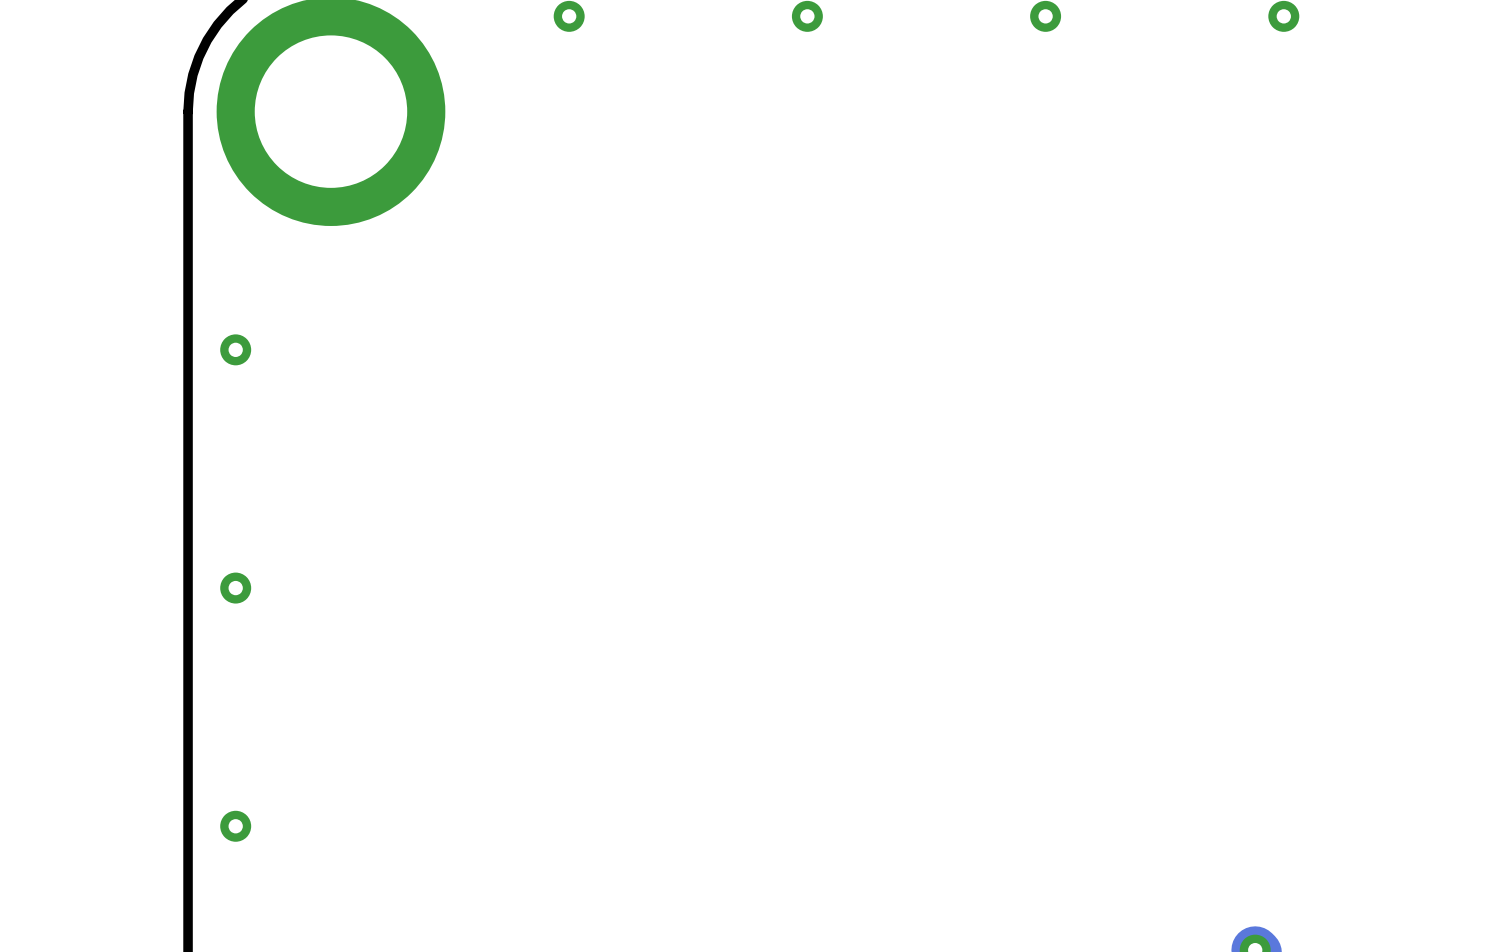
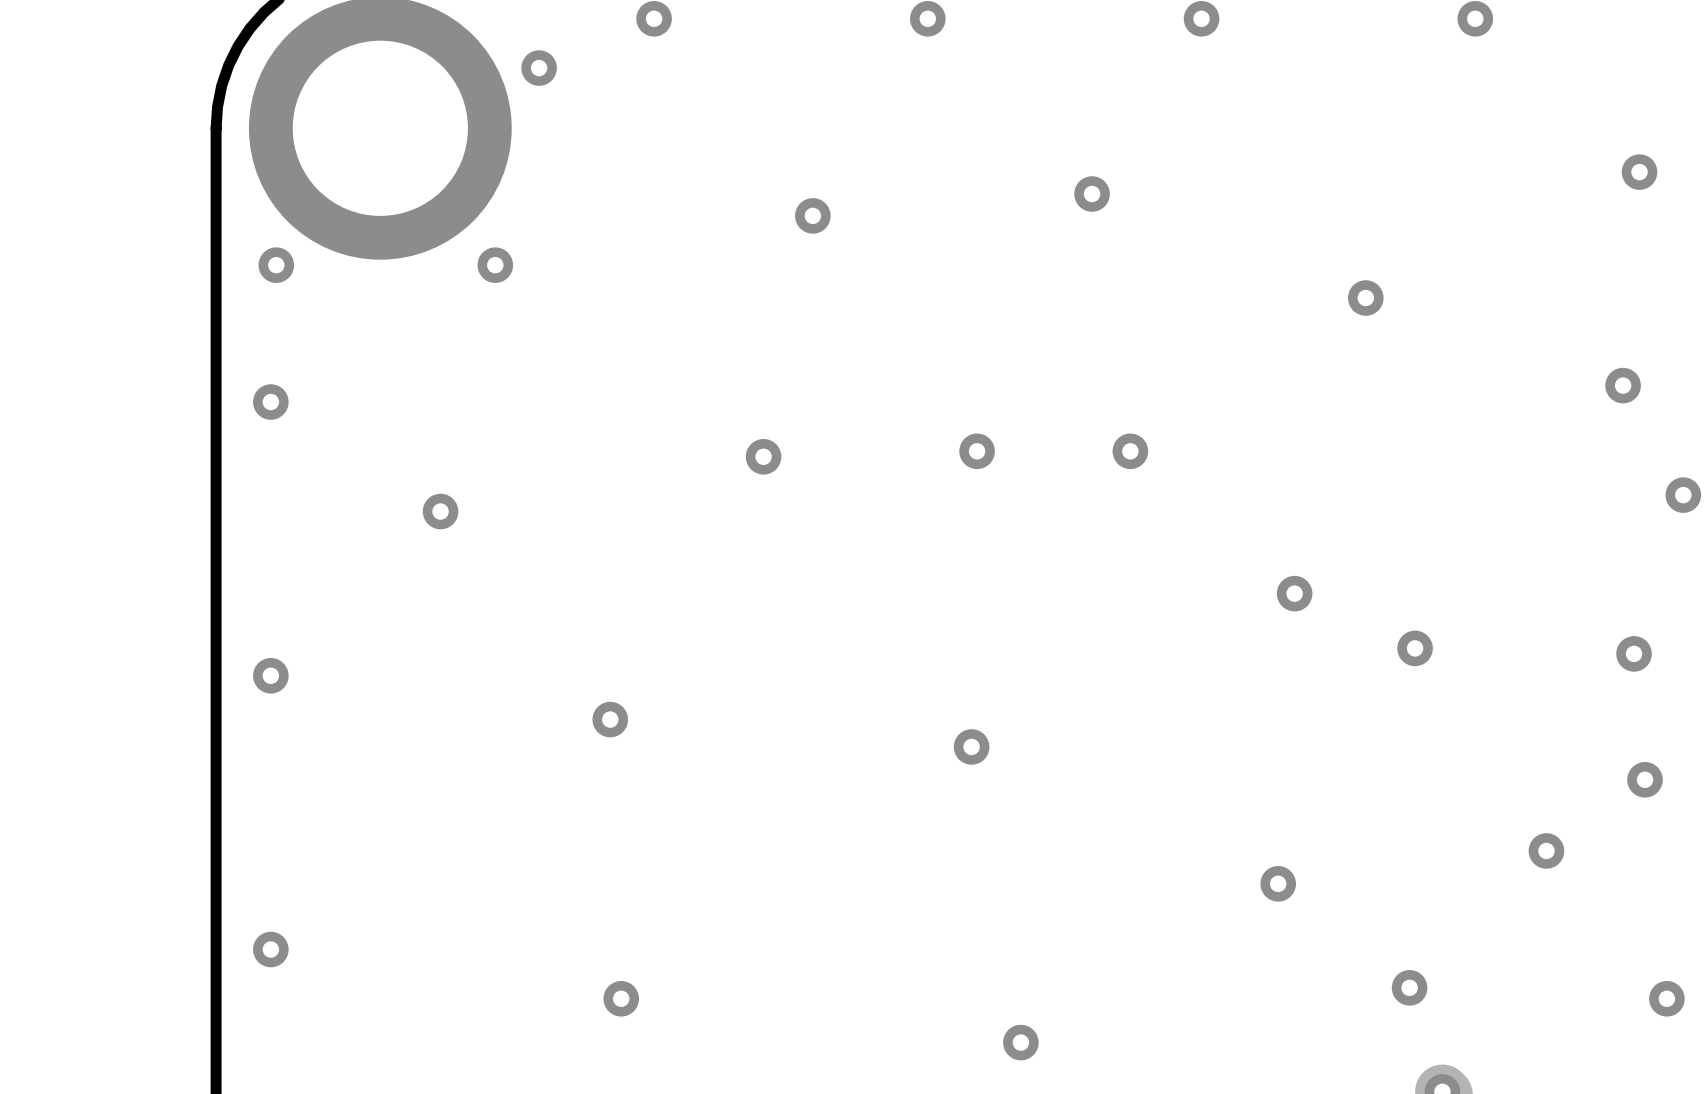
via: none -> (539, 68)
via: none -> (1639, 172)
via: none -> (1092, 193)
via: none -> (812, 215)
via: none -> (276, 265)
via: none -> (495, 265)
via: none -> (1365, 298)
via: none -> (1623, 385)
via: none -> (977, 451)
via: none -> (1130, 451)
via: none -> (763, 456)
via: none -> (1683, 495)
via: none -> (440, 511)
via: none -> (1294, 593)
via: none -> (1415, 648)
via: none -> (1634, 653)
via: none -> (610, 719)
via: none -> (971, 746)
via: none -> (1645, 779)
via: none -> (1546, 850)
via: none -> (1278, 883)
via: none -> (1409, 987)
via: none -> (621, 998)
via: none -> (1666, 998)
via: none -> (1020, 1042)

